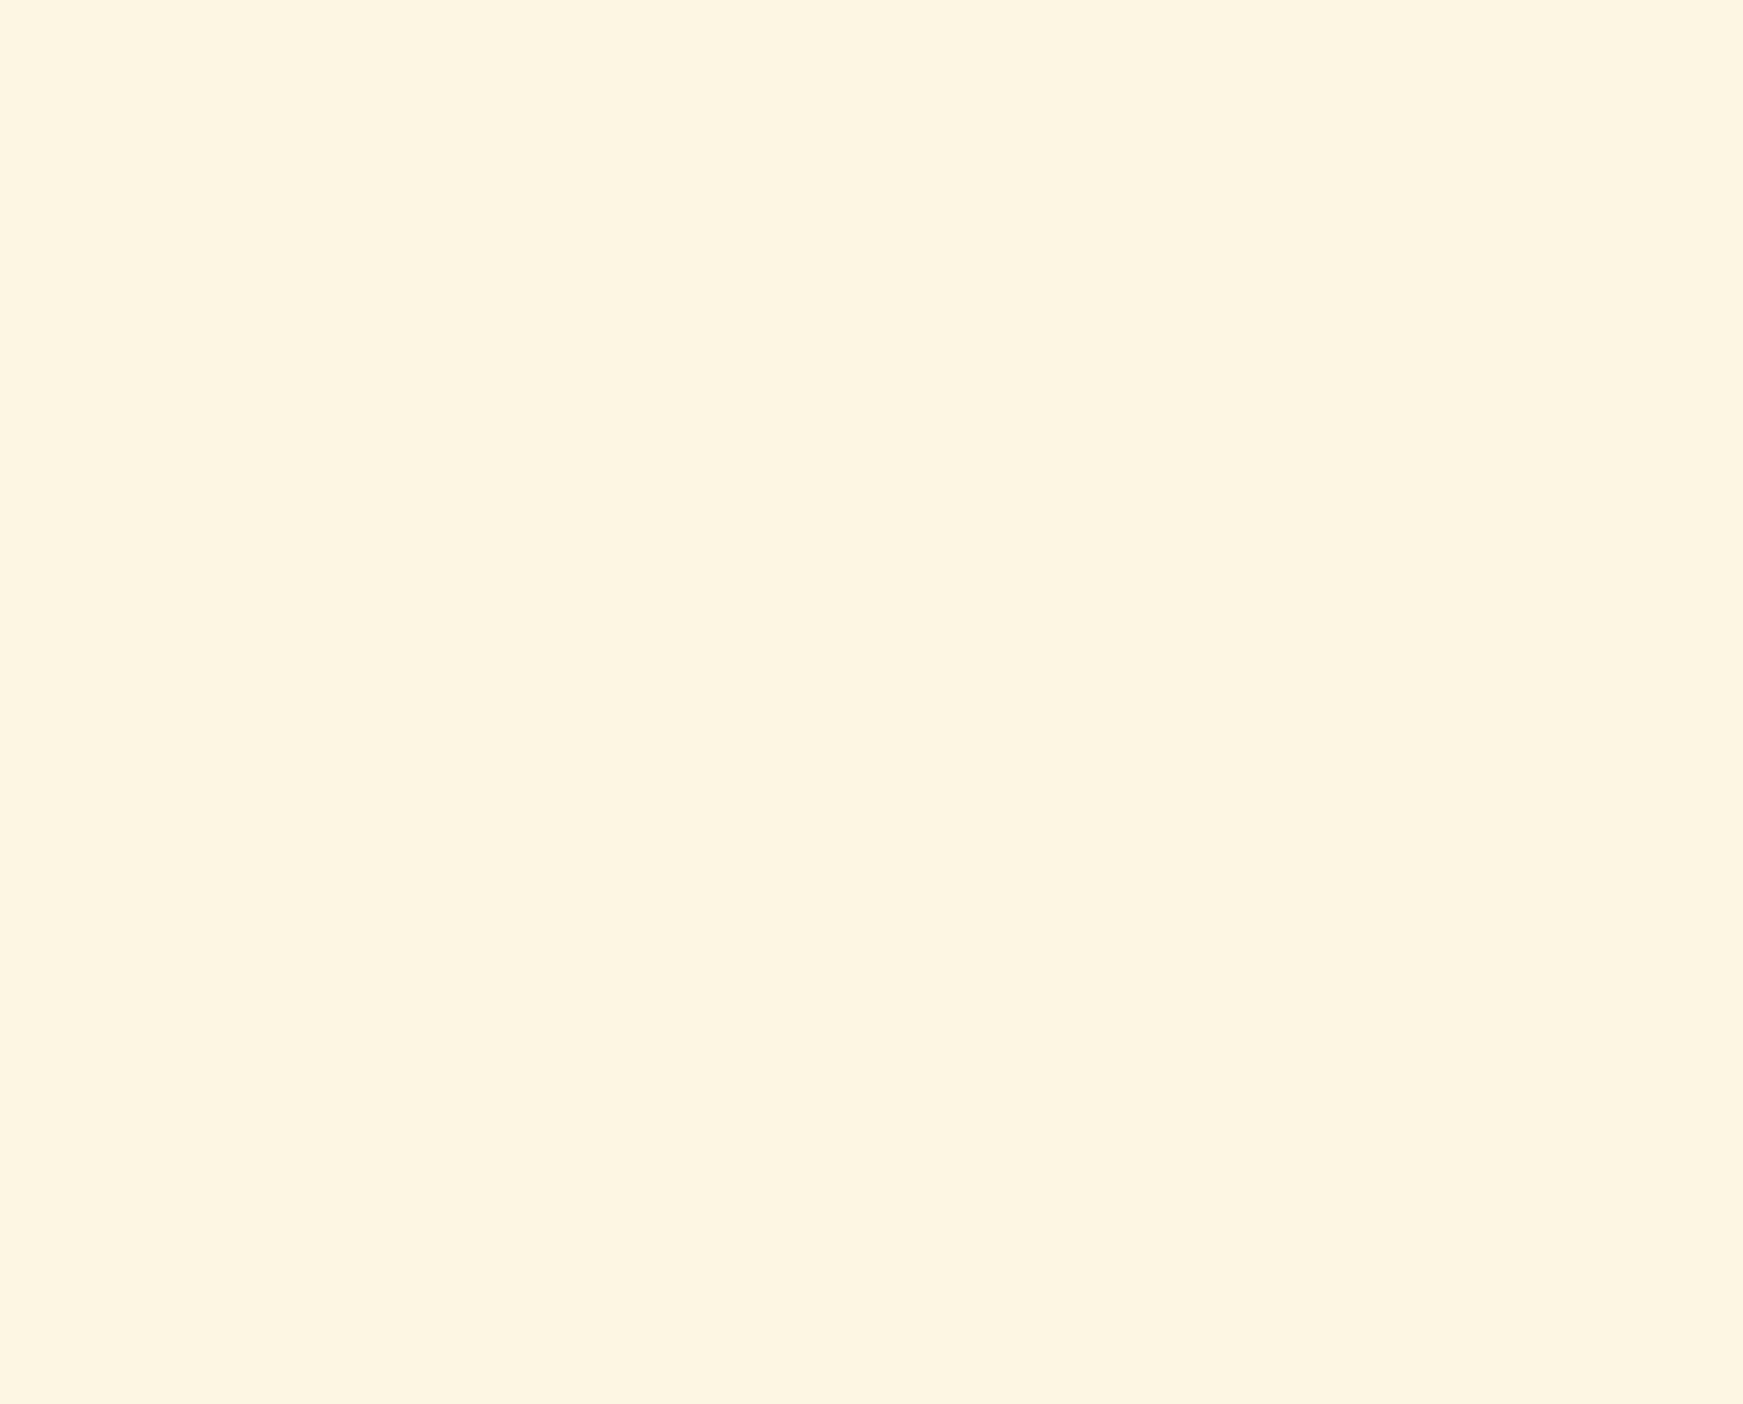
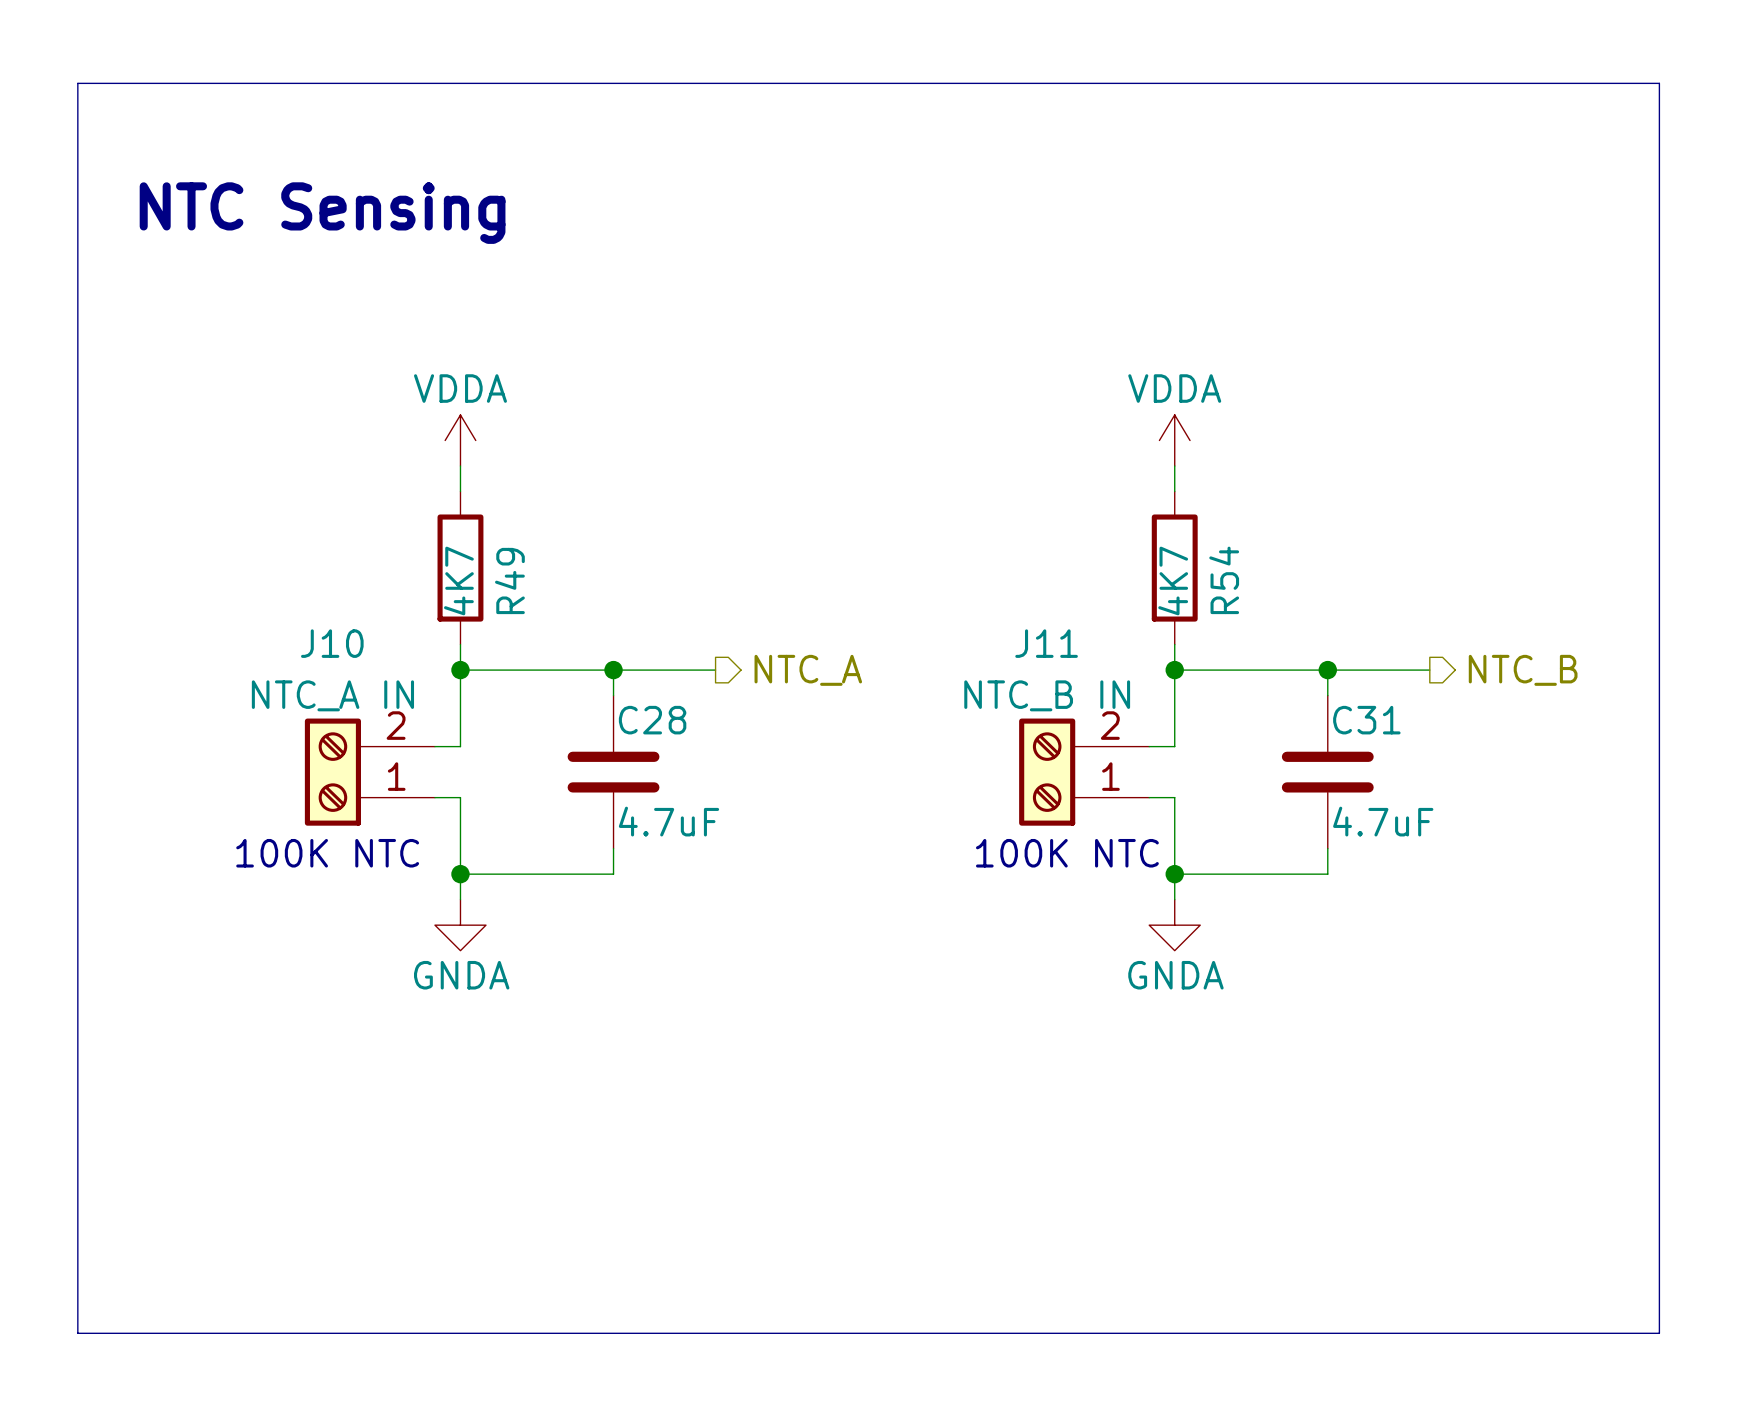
line: none -> (77, 83) (1659, 83) (1659, 1333) (77, 1333) (77, 83)
text: none -> NTC Sensing (322, 213)
power symbol: none -> VDDA (460, 440)
power symbol: none -> VDDA (1174, 440)
wire: none -> (460, 466) (460, 491)
wire: none -> (1174, 466) (1174, 491)
R49: none -> 4K7 (460, 568)
R54: none -> 4K7 (1174, 568)
wire: none -> (460, 644) (460, 746) (434, 746)
wire: none -> (1174, 644) (1174, 746) (1149, 746)
wire: none -> (460, 670) (715, 670)
junction: none -> (460, 670)
wire: none -> (613, 670) (613, 695)
junction: none -> (613, 670)
hierarchical label: none -> NTC_A (808, 670)
wire: none -> (1174, 670) (1429, 670)
junction: none -> (1174, 670)
wire: none -> (1327, 670) (1327, 695)
junction: none -> (1327, 670)
hierarchical label: none -> NTC_B (1523, 670)
J10: none -> NTC_A IN (369, 772)
C28: none -> 4.7uF (613, 772)
J11: none -> NTC_B IN (1084, 772)
C31: none -> 4.7uF (1327, 772)
wire: none -> (434, 797) (460, 797) (460, 899)
wire: none -> (1149, 797) (1174, 797) (1174, 899)
wire: none -> (613, 848) (613, 874) (460, 874)
wire: none -> (1327, 848) (1327, 874) (1174, 874)
text: none -> 100K NTC (327, 853)
text: none -> 100K NTC (1067, 853)
junction: none -> (460, 874)
junction: none -> (1174, 874)
power symbol: none -> GNDA (460, 925)
power symbol: none -> GNDA (1174, 925)

